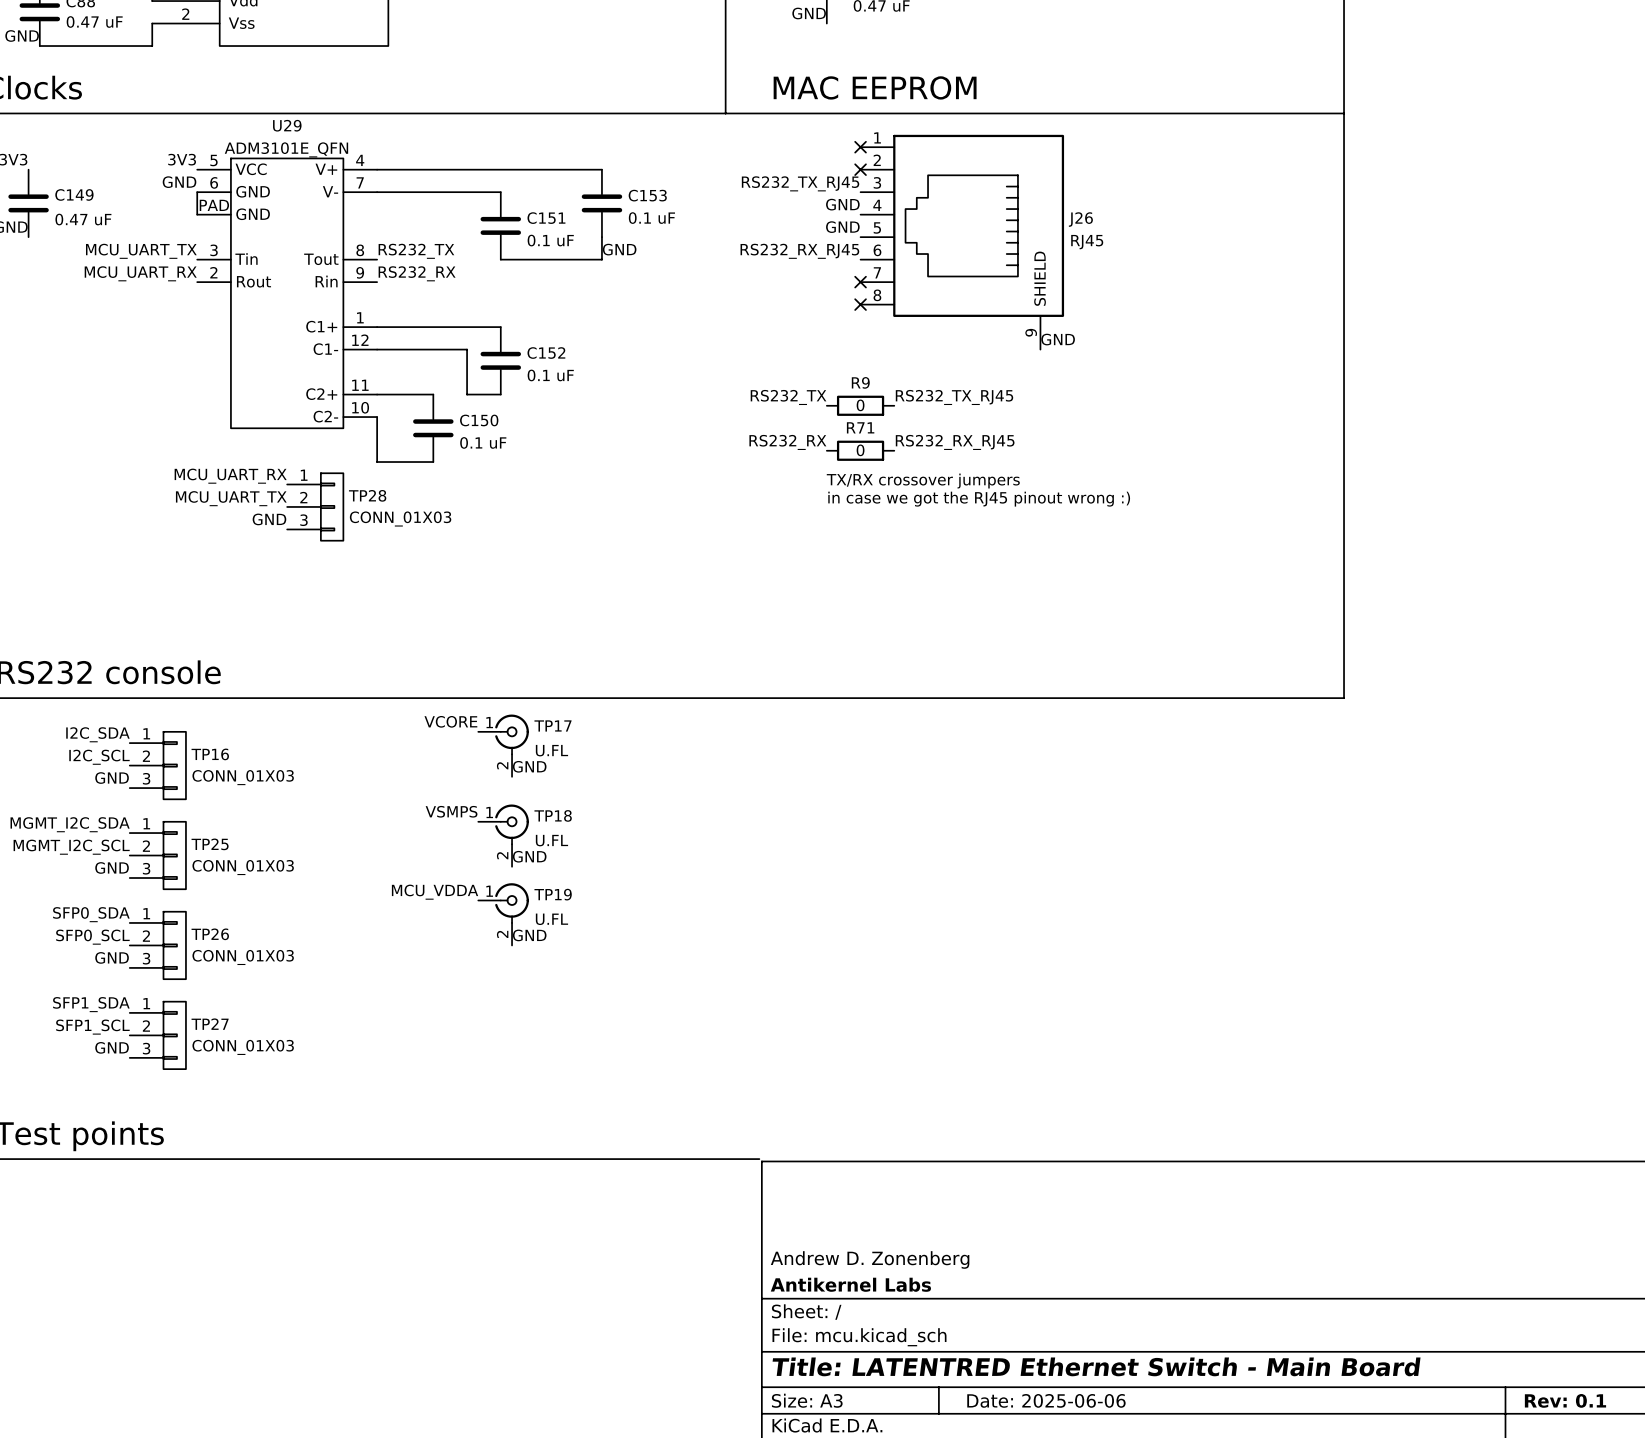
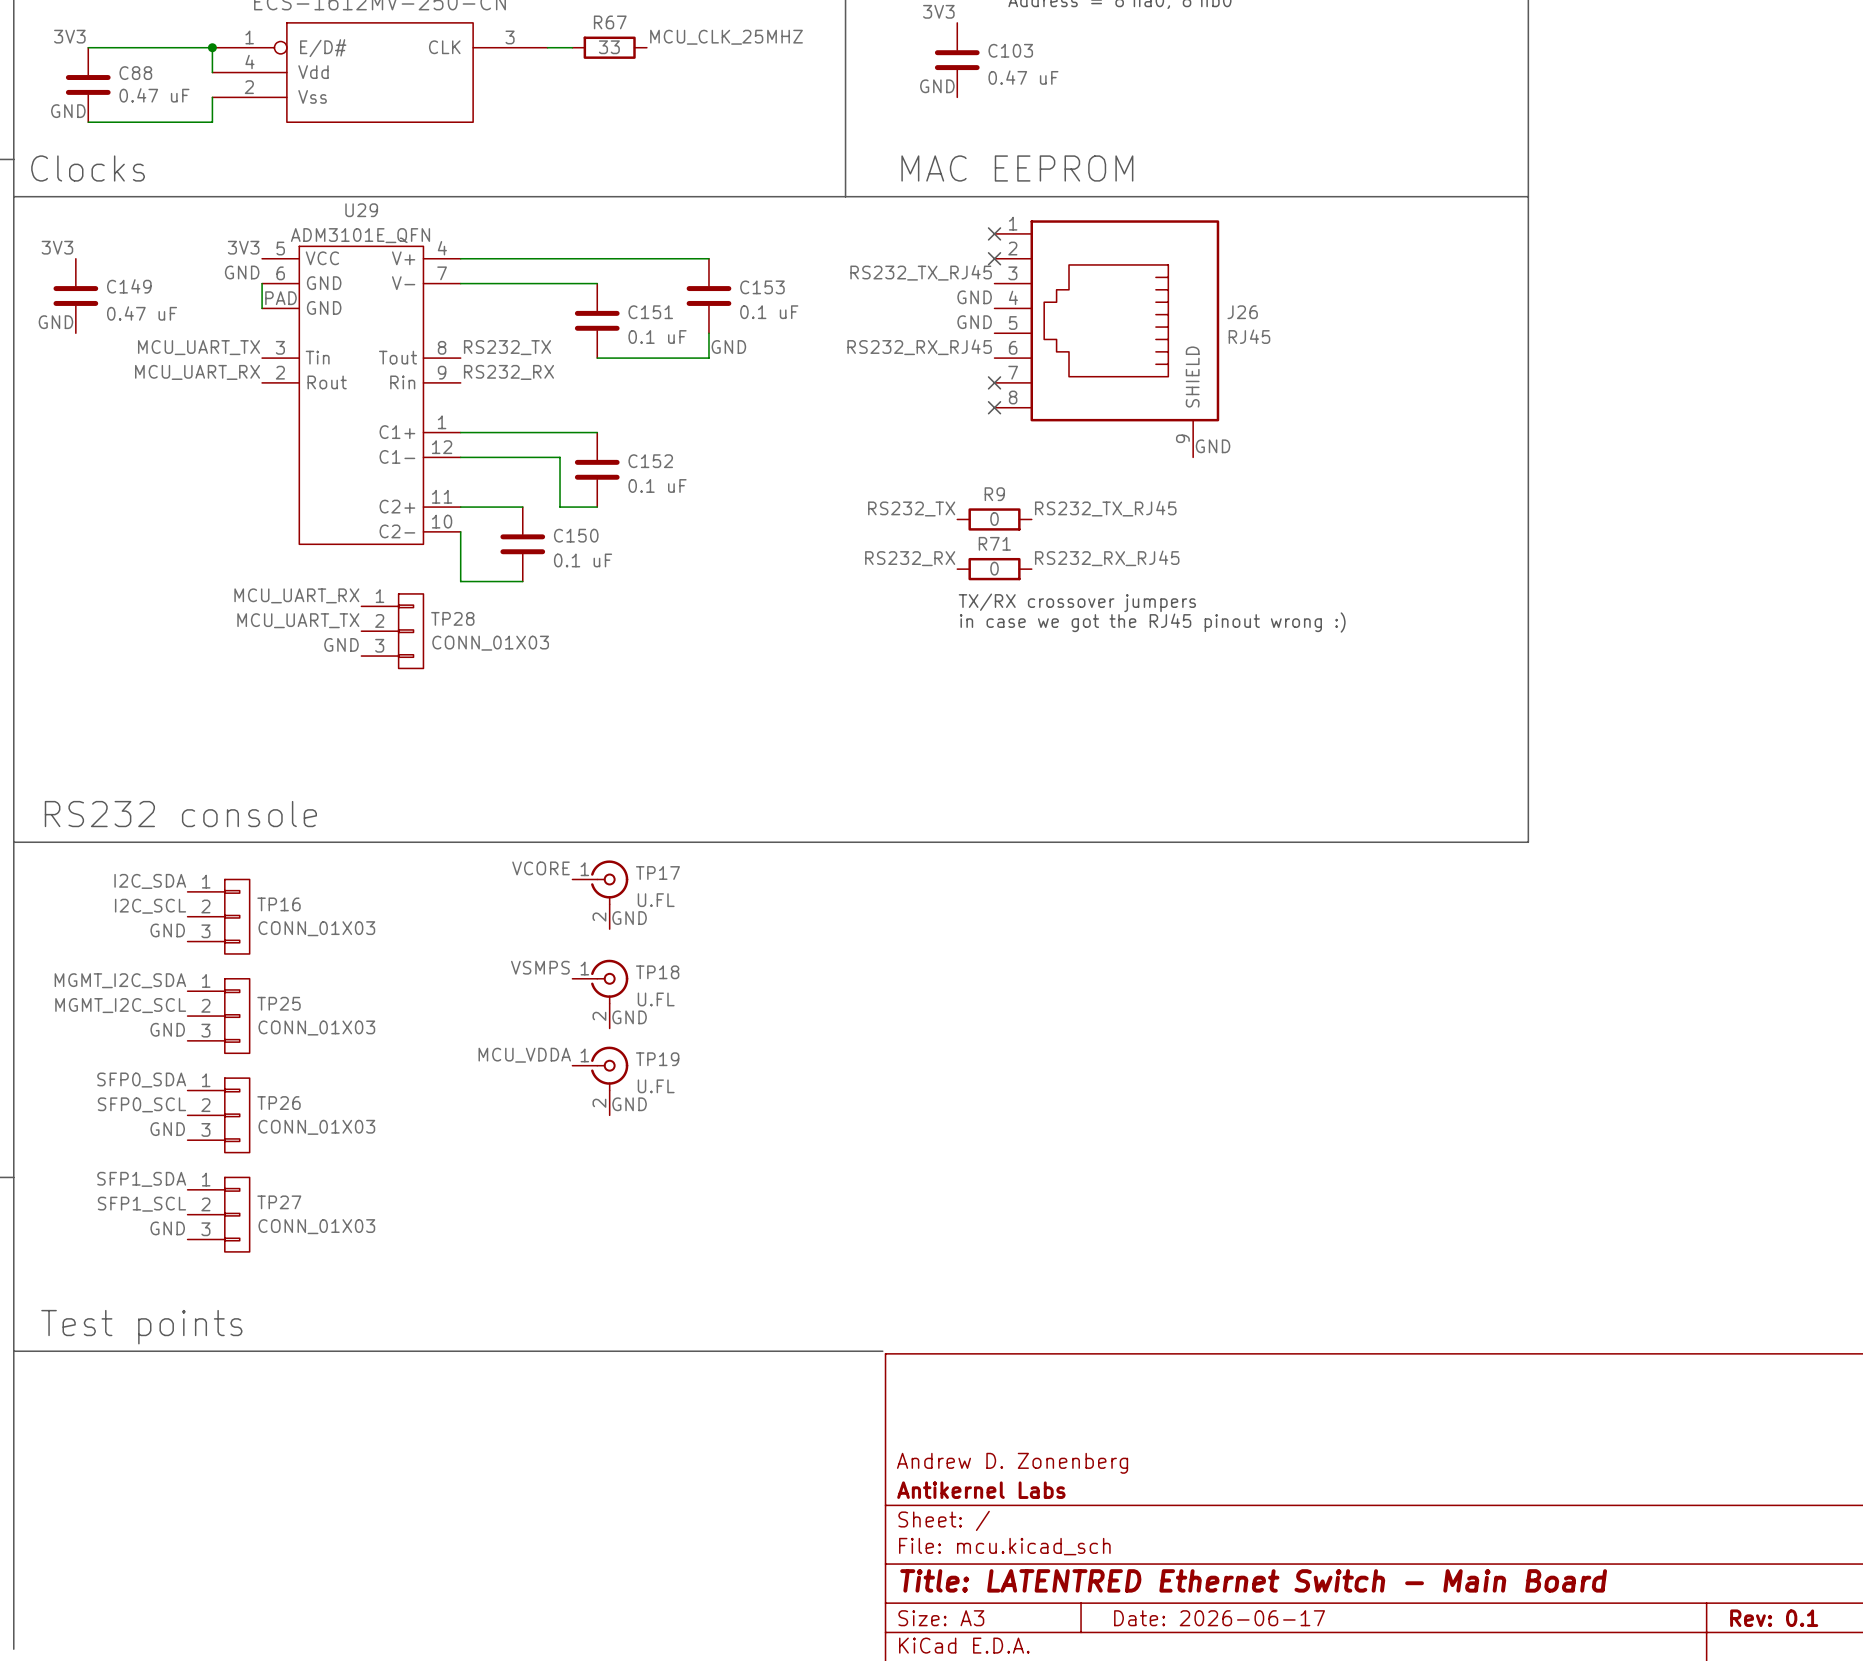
title block: Date: 2025-06-06 (1046, 1400) -> Date: 2026-06-17 (1219, 1618)

